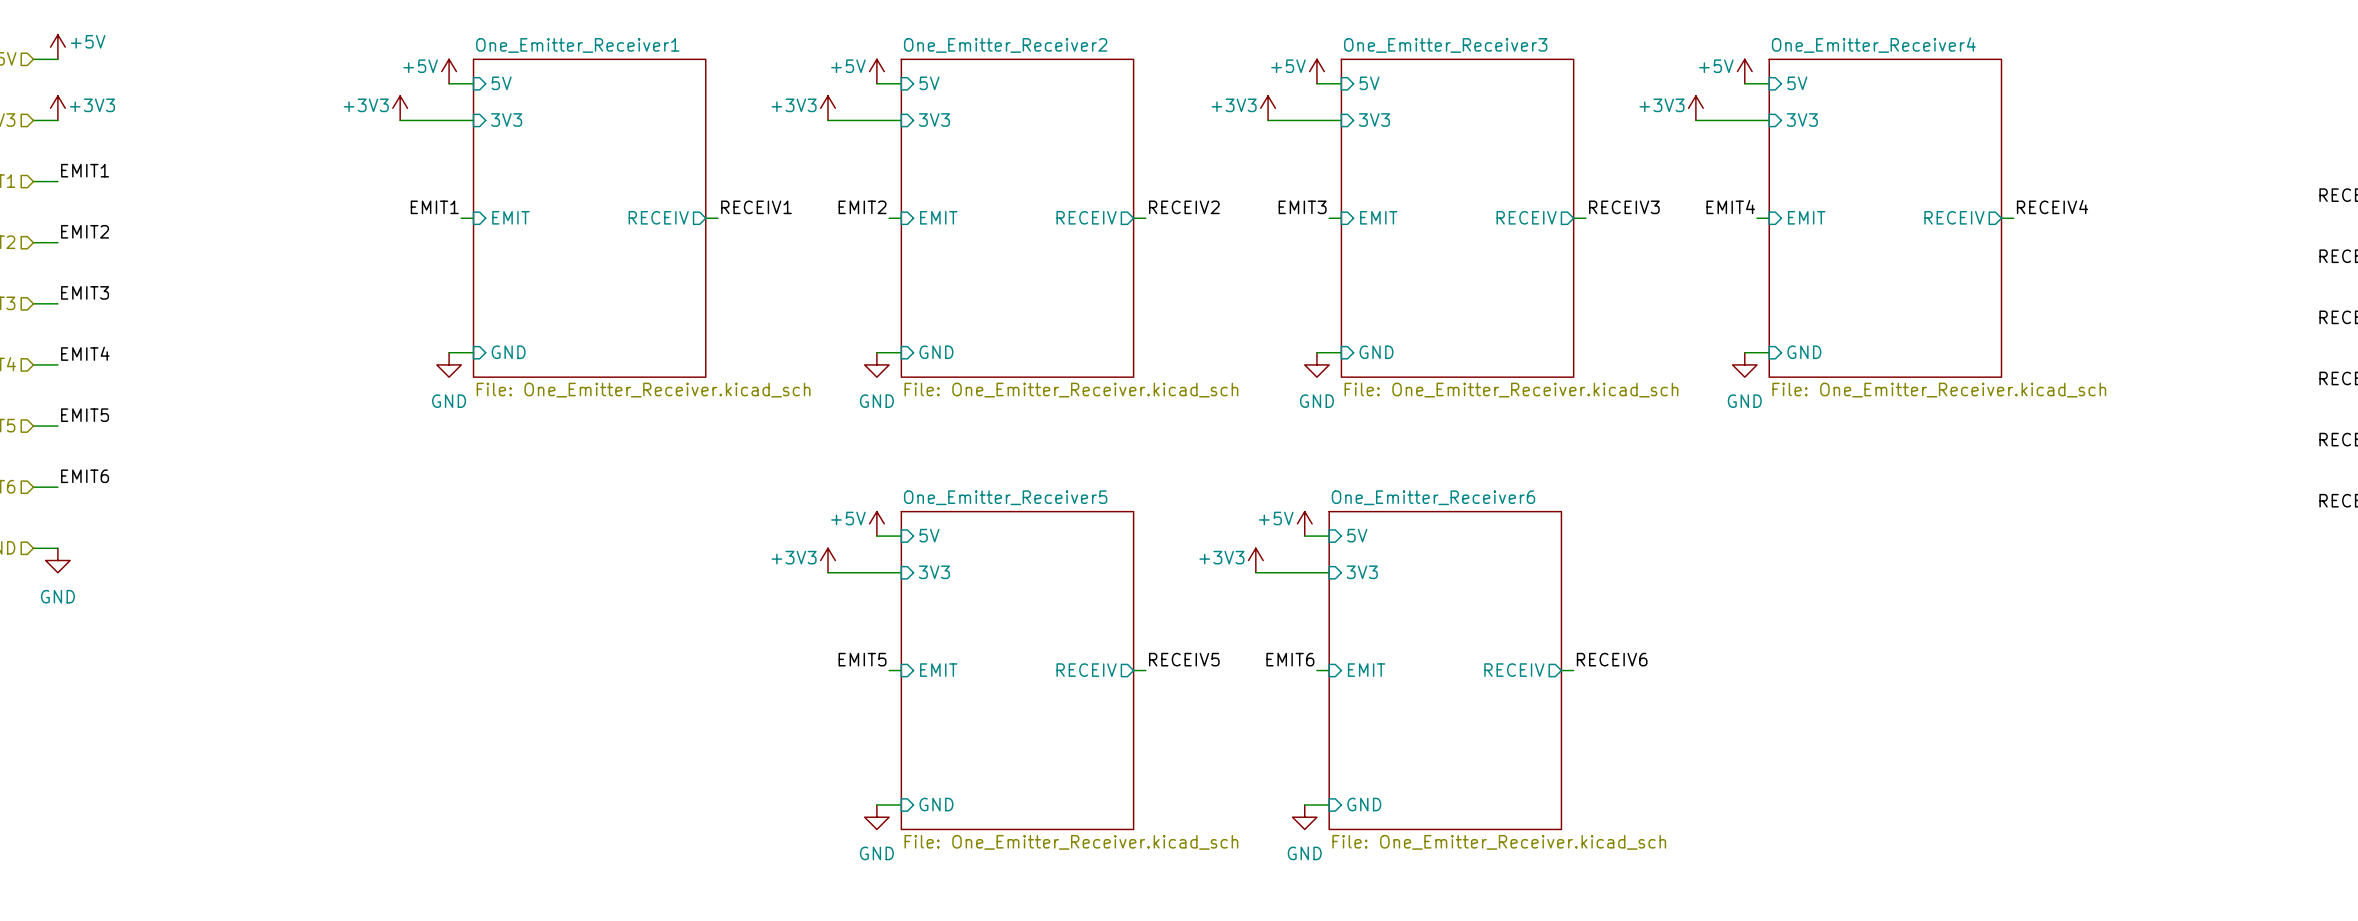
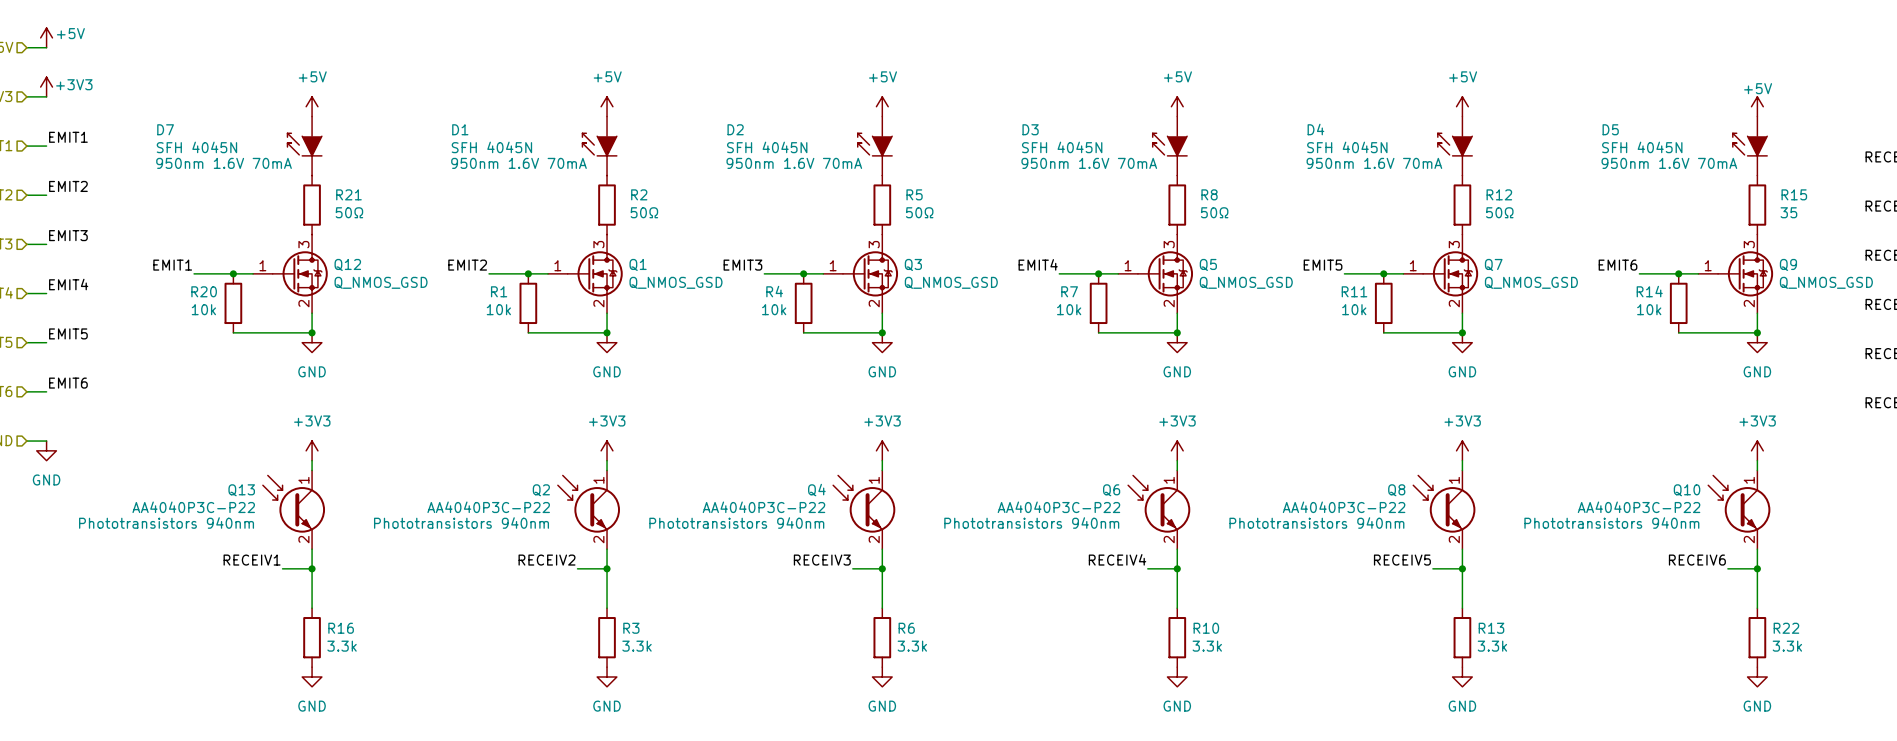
power symbol text position: +5V (420, 66) -> +5V (312, 76)
power symbol text position: +5V (1716, 66) -> +5V (1463, 76)
power symbol position: +5V (449, 71) -> +5V (312, 106)
power symbol: +5V (876, 71) -> none
power symbol: +5V (1316, 71) -> none
power symbol position: +5V (1744, 71) -> +5V (1462, 106)
wire: (449, 83) (473, 83) -> none
sheet pin: 5V (501, 83) -> none
wire: (876, 83) (901, 83) -> none
sheet pin: 5V (929, 83) -> none
wire: (1316, 83) (1341, 83) -> none
sheet pin: 5V (1369, 83) -> none
wire: (1744, 83) (1769, 83) -> none
sheet pin: 5V (1797, 83) -> none
power symbol: +3V3 (400, 108) -> none
power symbol: +3V3 (828, 108) -> none
power symbol: +3V3 (1268, 108) -> none
power symbol: +3V3 (1695, 108) -> none
wire: (400, 120) (473, 120) -> none
sheet pin: 3V3 (506, 120) -> none
wire: (828, 120) (901, 120) -> none
sheet pin: 3V3 (934, 120) -> none
wire: (1268, 120) (1341, 120) -> (1059, 273) (1118, 273)
sheet pin: 3V3 (1374, 120) -> none
wire: (1695, 120) (1769, 120) -> (1344, 273) (1403, 273)
sheet pin: 3V3 (1802, 120) -> none
power symbol: none -> +5V (607, 106)
power symbol: none -> +5V (882, 106)
power symbol: none -> +5V (1177, 106)
power symbol: none -> +5V (1757, 106)
D7: none -> SFH 4045N (304, 146)
D1: none -> SFH 4045N (599, 146)
D2: none -> SFH 4045N (875, 146)
D3: none -> SFH 4045N (1170, 146)
D4: none -> SFH 4045N (1455, 146)
D5: none -> SFH 4045N (1750, 146)
label: EMIT1 (434, 207) -> none
label: RECEIV1 (756, 207) -> none
label: EMIT2 (862, 207) -> none
label: RECEIV2 (1184, 207) -> none
label: EMIT3 (1302, 207) -> none
label: RECEIV3 (1624, 207) -> none
label: EMIT4 (1730, 207) -> none
label: RECEIV4 (2052, 207) -> none
sheet pin: EMIT (510, 217) -> none
sheet pin: RECEIV (658, 217) -> none
sheet pin: EMIT (938, 217) -> none
sheet pin: RECEIV (1086, 217) -> none
sheet pin: EMIT (1378, 217) -> none
sheet pin: RECEIV (1526, 217) -> none
sheet pin: EMIT (1806, 217) -> none
sheet pin: RECEIV (1954, 217) -> none
wire: (461, 218) (473, 218) -> none
sheet One_Emitter_Receiver1: File: One_Emitter_Receiver.kicad_sch (589, 218) -> none
wire: (705, 218) (717, 218) -> none
wire: (889, 218) (901, 218) -> none
sheet One_Emitter_Receiver2: File: One_Emitter_Receiver.kicad_sch (1017, 218) -> none
wire: (1133, 218) (1145, 218) -> none
wire: (1329, 218) (1341, 218) -> none
sheet One_Emitter_Receiver3: File: One_Emitter_Receiver.kicad_sch (1457, 218) -> none
wire: (1573, 218) (1585, 218) -> none
wire: (1757, 218) (1769, 218) -> none
sheet One_Emitter_Receiver4: File: One_Emitter_Receiver.kicad_sch (1885, 218) -> none
wire: (2001, 218) (2013, 218) -> none
R21: none -> 50Ω (312, 205)
R2: none -> 50Ω (607, 205)
R5: none -> 50Ω (882, 205)
R8: none -> 50Ω (1177, 205)
R12: none -> 50Ω (1462, 205)
R15: none -> 35 (1757, 205)
label: none -> EMIT1 (172, 265)
label: none -> EMIT2 (467, 265)
label: none -> EMIT3 (742, 265)
label: none -> EMIT4 (1038, 264)
label: none -> EMIT5 (1323, 265)
label: none -> EMIT6 (1618, 265)
wire: none -> (194, 273) (253, 273)
junction: none -> (233, 273)
Q12: none -> Q_NMOS_GSD (290, 273)
wire: none -> (489, 273) (548, 273)
junction: none -> (528, 273)
Q1: none -> Q_NMOS_GSD (585, 273)
wire: none -> (764, 273) (823, 273)
junction: none -> (803, 273)
Q3: none -> Q_NMOS_GSD (860, 273)
junction: none -> (1098, 273)
Q5: none -> Q_NMOS_GSD (1155, 273)
junction: none -> (1383, 273)
Q7: none -> Q_NMOS_GSD (1440, 273)
wire: none -> (1639, 273) (1698, 273)
junction: none -> (1678, 273)
Q9: none -> Q_NMOS_GSD (1735, 273)
wire: (449, 352) (473, 352) -> none
sheet pin: GND (508, 352) -> none
wire: (876, 352) (901, 352) -> none
sheet pin: GND (936, 352) -> none
wire: (1316, 352) (1341, 352) -> none
sheet pin: GND (1376, 352) -> none
wire: (1744, 352) (1769, 352) -> none
sheet pin: GND (1804, 352) -> none
power symbol position: GND (449, 364) -> GND (312, 342)
power symbol: GND (876, 364) -> none
power symbol: GND (1316, 364) -> none
power symbol position: GND (1744, 364) -> GND (1462, 342)
R20: none -> 10k (233, 303)
R1: none -> 10k (528, 303)
R4: none -> 10k (803, 303)
R7: none -> 10k (1098, 303)
R11: none -> 10k (1383, 303)
R14: none -> 10k (1678, 303)
wire: none -> (312, 313) (312, 332) (233, 332)
wire: none -> (607, 313) (607, 332) (528, 332)
wire: none -> (882, 313) (882, 332) (803, 332)
wire: none -> (1177, 313) (1177, 332) (1098, 332)
wire: none -> (1462, 313) (1462, 332) (1383, 332)
wire: none -> (1757, 313) (1757, 332) (1678, 332)
junction: none -> (312, 332)
junction: none -> (607, 332)
junction: none -> (882, 332)
junction: none -> (1177, 332)
junction: none -> (1462, 332)
junction: none -> (1757, 332)
power symbol: none -> GND (607, 342)
power symbol: none -> GND (882, 342)
power symbol: none -> GND (1177, 342)
power symbol: none -> GND (1757, 342)
power symbol: +5V (876, 523) -> none
power symbol: +5V (1304, 523) -> none
sheet pin: 5V (929, 535) -> none
sheet pin: 5V (1357, 535) -> none
wire: (876, 536) (901, 536) -> none
wire: (1304, 536) (1329, 536) -> none
power symbol text position: +3V3 (794, 557) -> +3V3 (607, 420)
power symbol: none -> +3V3 (312, 450)
power symbol position: +3V3 (828, 560) -> +3V3 (607, 450)
power symbol: none -> +3V3 (882, 450)
power symbol: +3V3 (1255, 560) -> none
power symbol: none -> +3V3 (1177, 450)
power symbol: none -> +3V3 (1462, 450)
power symbol: none -> +3V3 (1757, 450)
wire: none -> (312, 460) (312, 470)
wire: none -> (607, 460) (607, 470)
wire: (828, 572) (901, 572) -> none
sheet pin: 3V3 (934, 572) -> none
wire: none -> (882, 460) (882, 470)
wire: (1255, 572) (1329, 572) -> none
sheet pin: 3V3 (1362, 572) -> none
wire: none -> (1177, 460) (1177, 470)
wire: none -> (1462, 460) (1462, 470)
wire: none -> (1757, 460) (1757, 470)
Q13: none -> AA4040P3C-P22 (293, 509)
Q2: none -> AA4040P3C-P22 (588, 509)
Q4: none -> AA4040P3C-P22 (864, 509)
Q6: none -> AA4040P3C-P22 (1159, 509)
Q8: none -> AA4040P3C-P22 (1444, 509)
Q10: none -> AA4040P3C-P22 (1739, 509)
label: EMIT5 (862, 659) -> none
label: RECEIV5 (1184, 659) -> none
label: EMIT6 (1290, 659) -> none
label: RECEIV6 (1612, 659) -> none
wire: (889, 670) (901, 670) -> none
sheet pin: EMIT (938, 670) -> none
sheet One_Emitter_Receiver5: File: One_Emitter_Receiver.kicad_sch (1017, 670) -> none
sheet pin: RECEIV (1086, 670) -> none
wire: (1133, 670) (1145, 670) -> none
wire: (1316, 670) (1329, 670) -> none
sheet pin: EMIT (1366, 670) -> none
sheet One_Emitter_Receiver6: File: One_Emitter_Receiver.kicad_sch (1445, 670) -> none
sheet pin: RECEIV (1514, 670) -> none
wire: (1561, 670) (1573, 670) -> none
wire: none -> (312, 549) (312, 608)
wire: none -> (607, 549) (607, 608)
wire: none -> (882, 549) (882, 608)
wire: none -> (1177, 549) (1177, 608)
wire: none -> (1462, 549) (1462, 608)
wire: none -> (1757, 549) (1757, 608)
label: none -> RECEIV1 (252, 560)
label: none -> RECEIV2 (547, 560)
label: none -> RECEIV3 (822, 560)
label: none -> RECEIV4 (1117, 559)
label: none -> RECEIV5 (1402, 560)
label: none -> RECEIV6 (1697, 560)
wire: none -> (282, 568) (312, 568)
junction: none -> (312, 568)
wire: none -> (577, 568) (607, 568)
junction: none -> (607, 568)
wire: none -> (852, 568) (882, 568)
junction: none -> (882, 568)
wire: none -> (1147, 568) (1177, 568)
junction: none -> (1177, 568)
wire: none -> (1432, 568) (1462, 568)
junction: none -> (1462, 568)
wire: none -> (1727, 568) (1757, 568)
junction: none -> (1757, 568)
R16: none -> 3.3k (312, 637)
R3: none -> 3.3k (607, 637)
R6: none -> 3.3k (882, 637)
R10: none -> 3.3k (1177, 637)
R13: none -> 3.3k (1462, 637)
R22: none -> 3.3k (1757, 637)
sheet pin: GND (936, 804) -> none
sheet pin: GND (1364, 804) -> none
wire: (876, 805) (901, 805) -> none
wire: (1304, 805) (1329, 805) -> none
power symbol: GND (876, 817) -> none
power symbol: GND (1304, 817) -> none
power symbol: none -> GND (312, 677)
power symbol: none -> GND (607, 677)
power symbol: none -> GND (882, 677)
power symbol: none -> GND (1177, 677)
power symbol: none -> GND (1462, 677)
power symbol: none -> GND (1757, 677)

